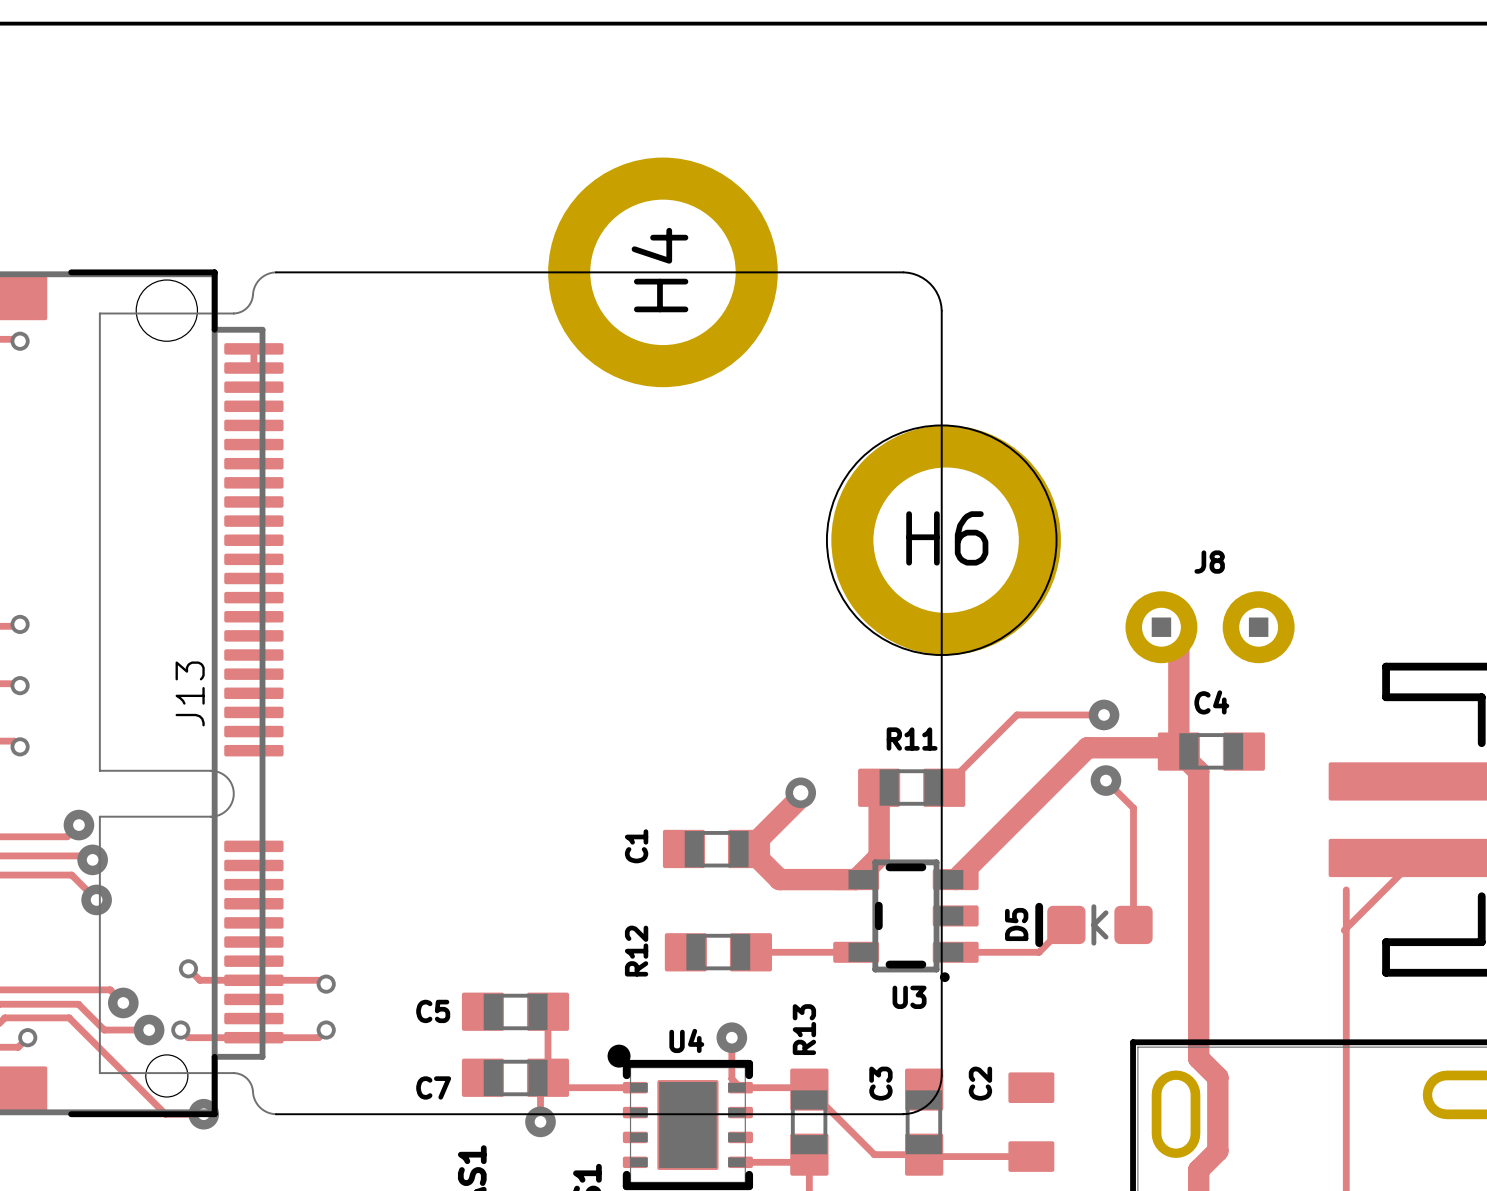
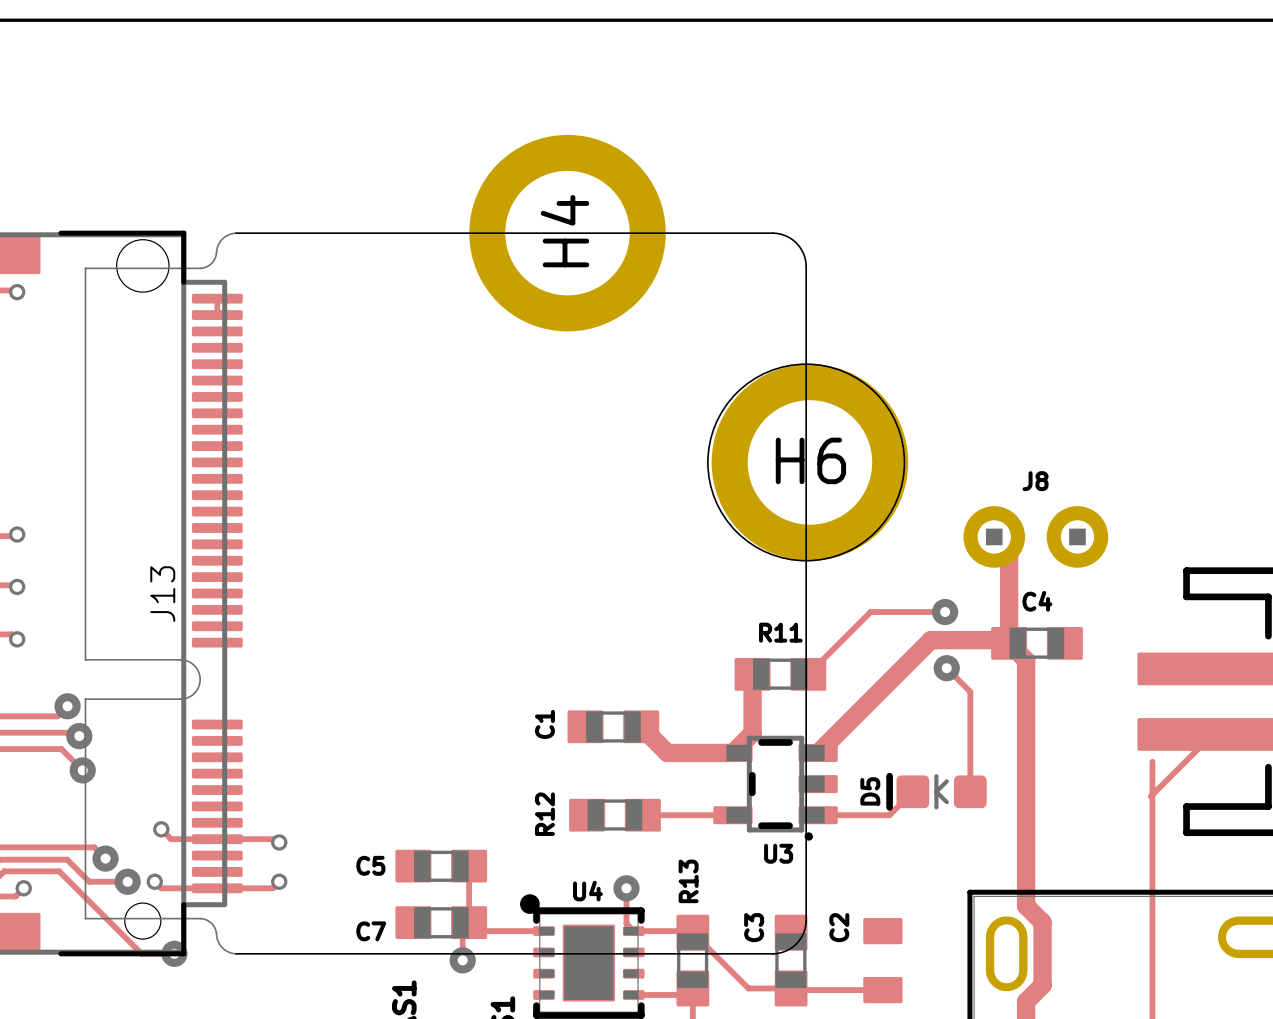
track: (800, 792) (800, 797) (749, 848) -> none
via: (800, 792) -> none

